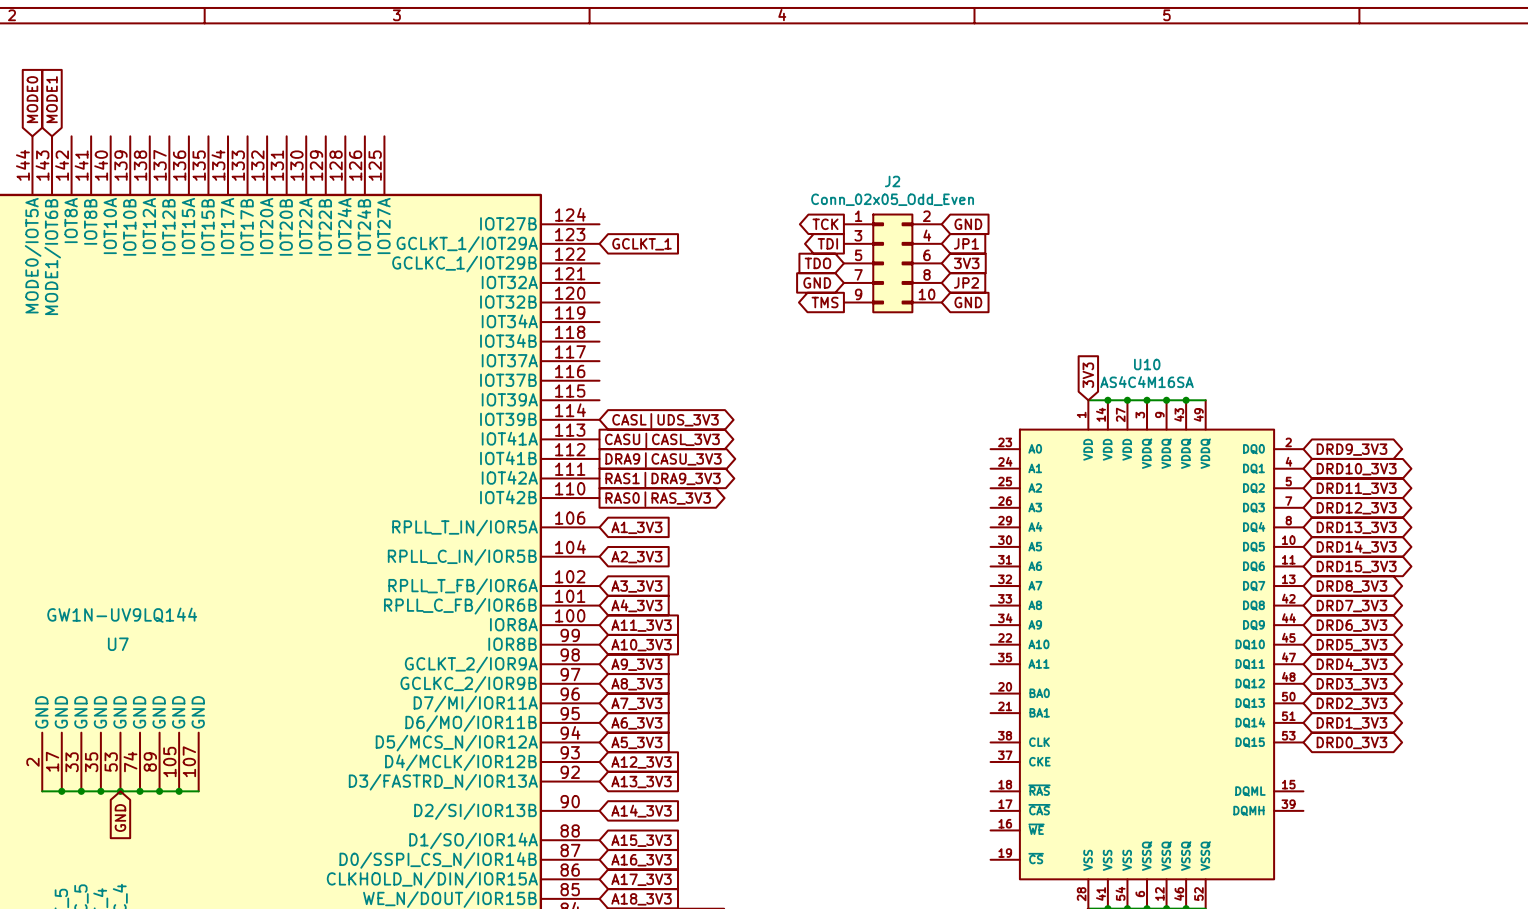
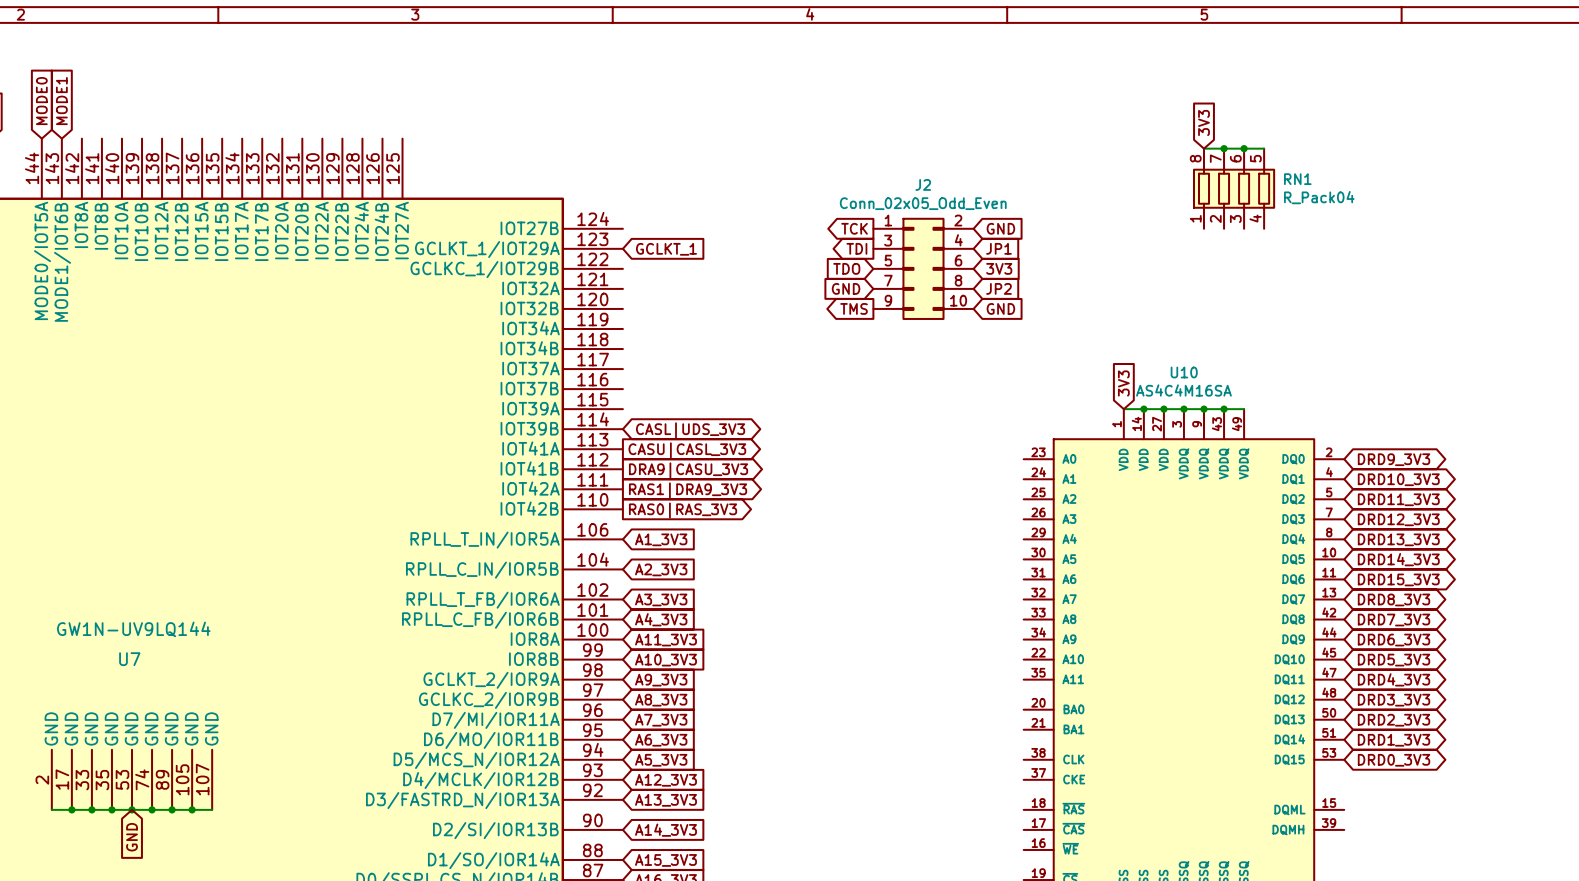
global label: none -> 3V3 (1204, 122)
wire: none -> (1204, 148) (1264, 148)
junction: none -> (1224, 148)
junction: none -> (1244, 148)
RN1: none -> R_Pack04 (1234, 188)

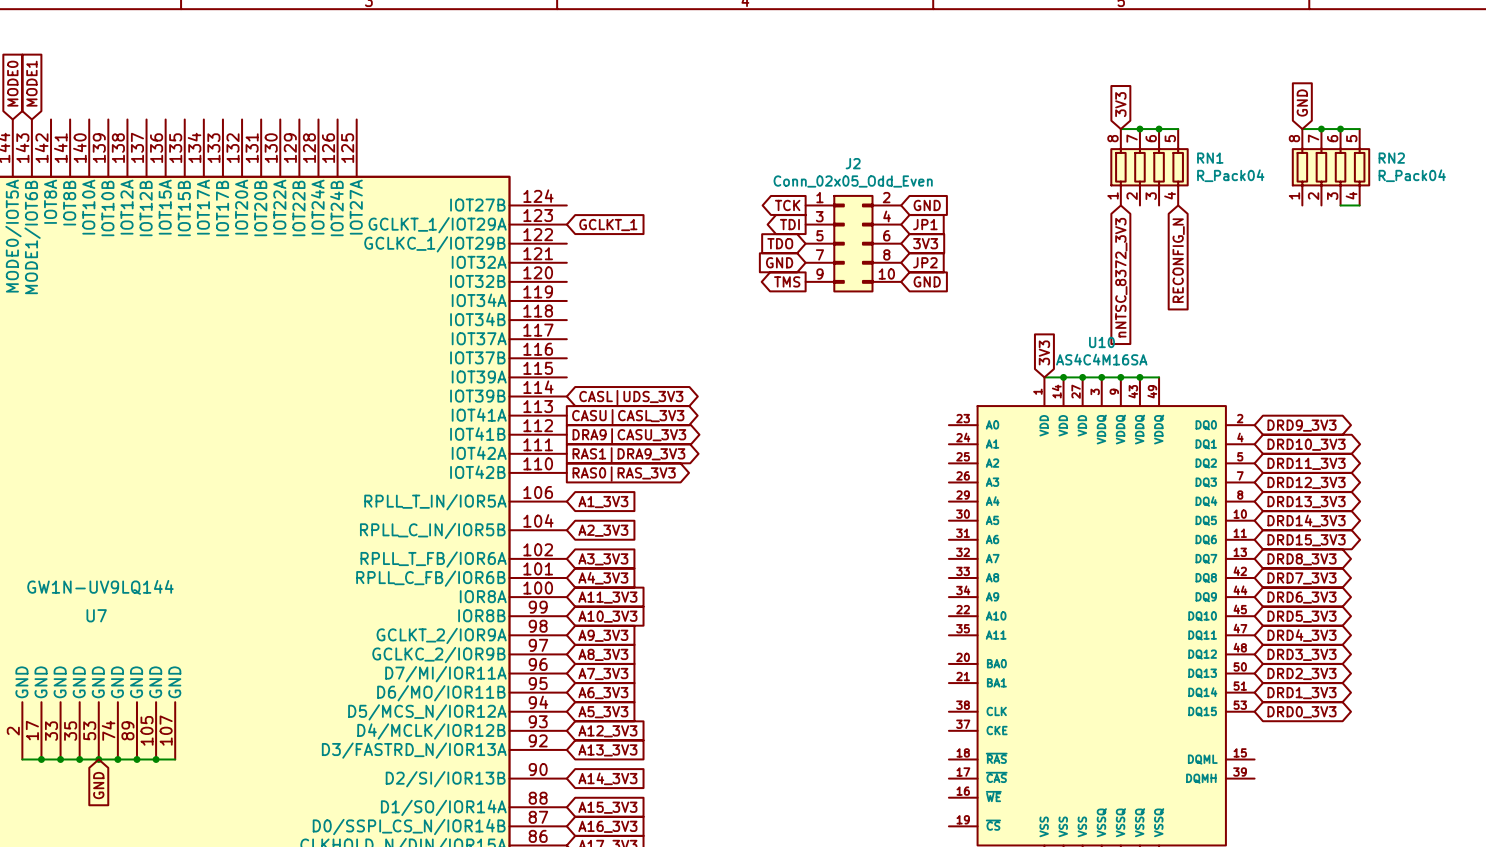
global label: none -> GND (1302, 102)
wire: none -> (1302, 129) (1359, 129)
junction: none -> (1321, 129)
junction: none -> (1340, 129)
RN2: none -> R_Pack04 (1331, 167)
wire: none -> (1340, 205) (1359, 205)
global label: none -> RECONFIG_N (1178, 260)
global label: none -> nNTSC_8372_3V3 (1121, 277)

